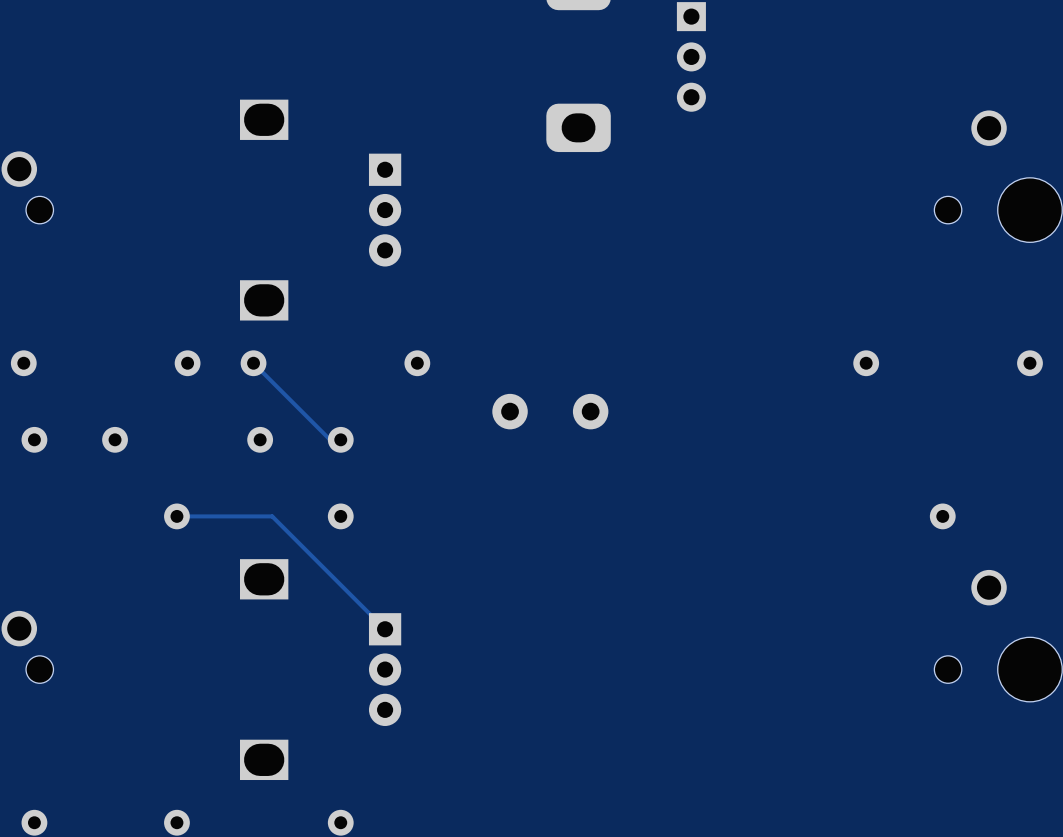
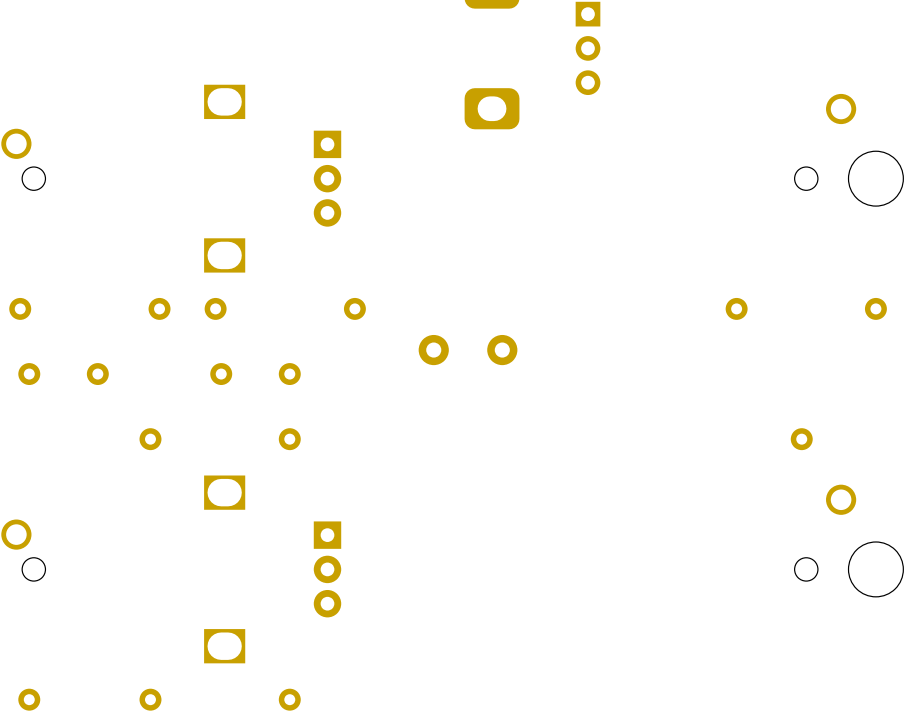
track: (253, 363) (330, 439) (340, 439) -> none
track: (176, 516) (272, 516) (385, 629) -> none

